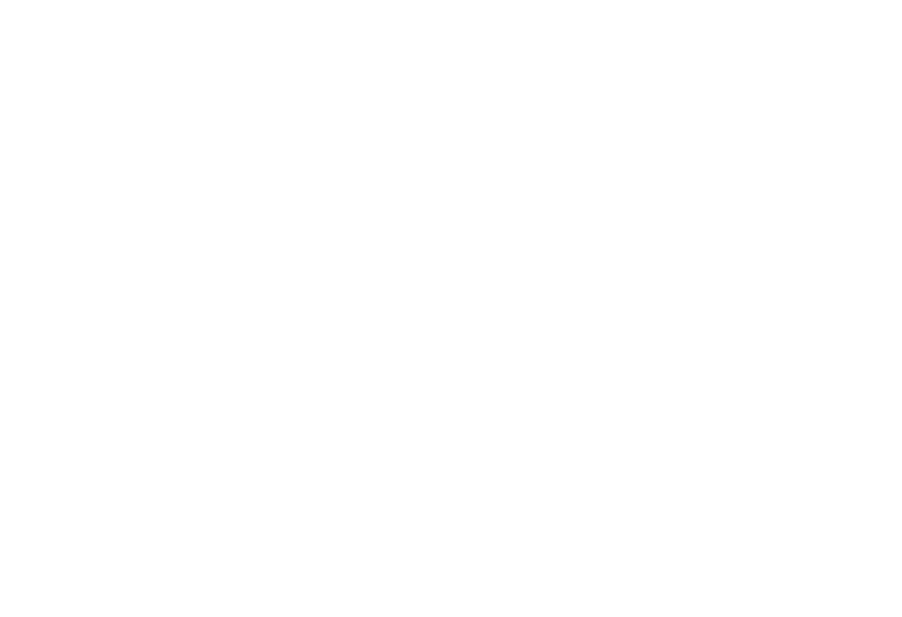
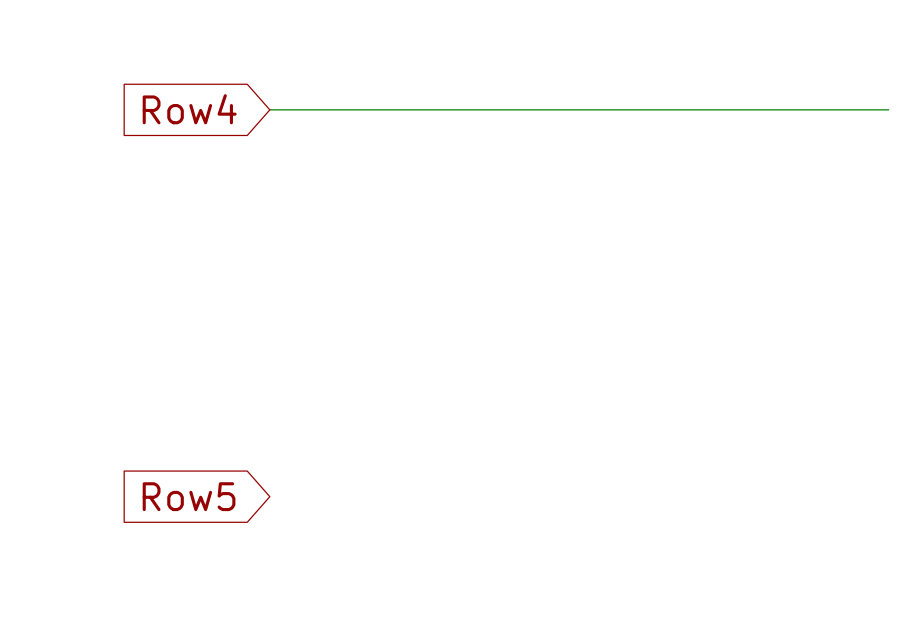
global label: none -> Row4 (189, 109)
wire: none -> (269, 109) (888, 109)
global label: none -> Row5 (189, 496)

